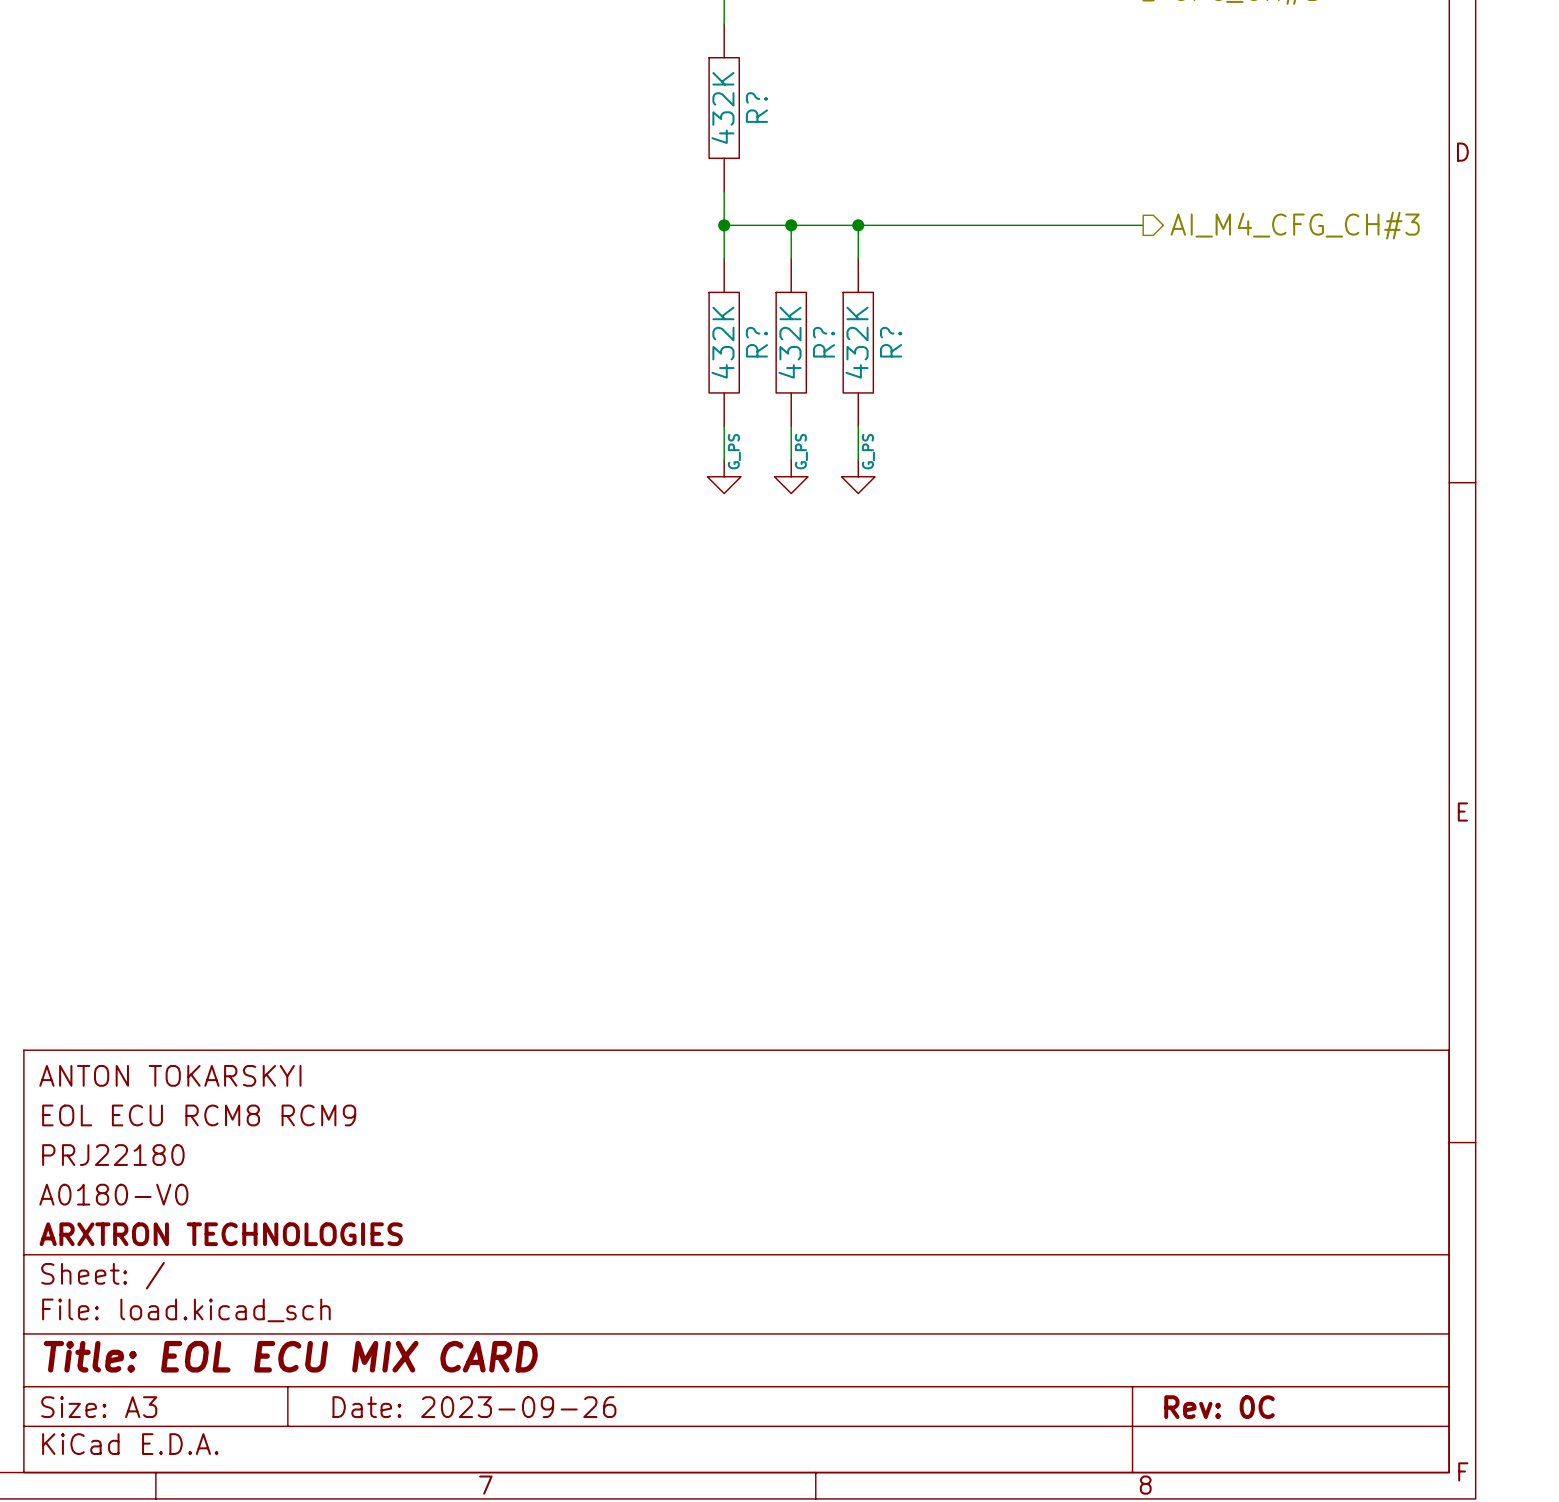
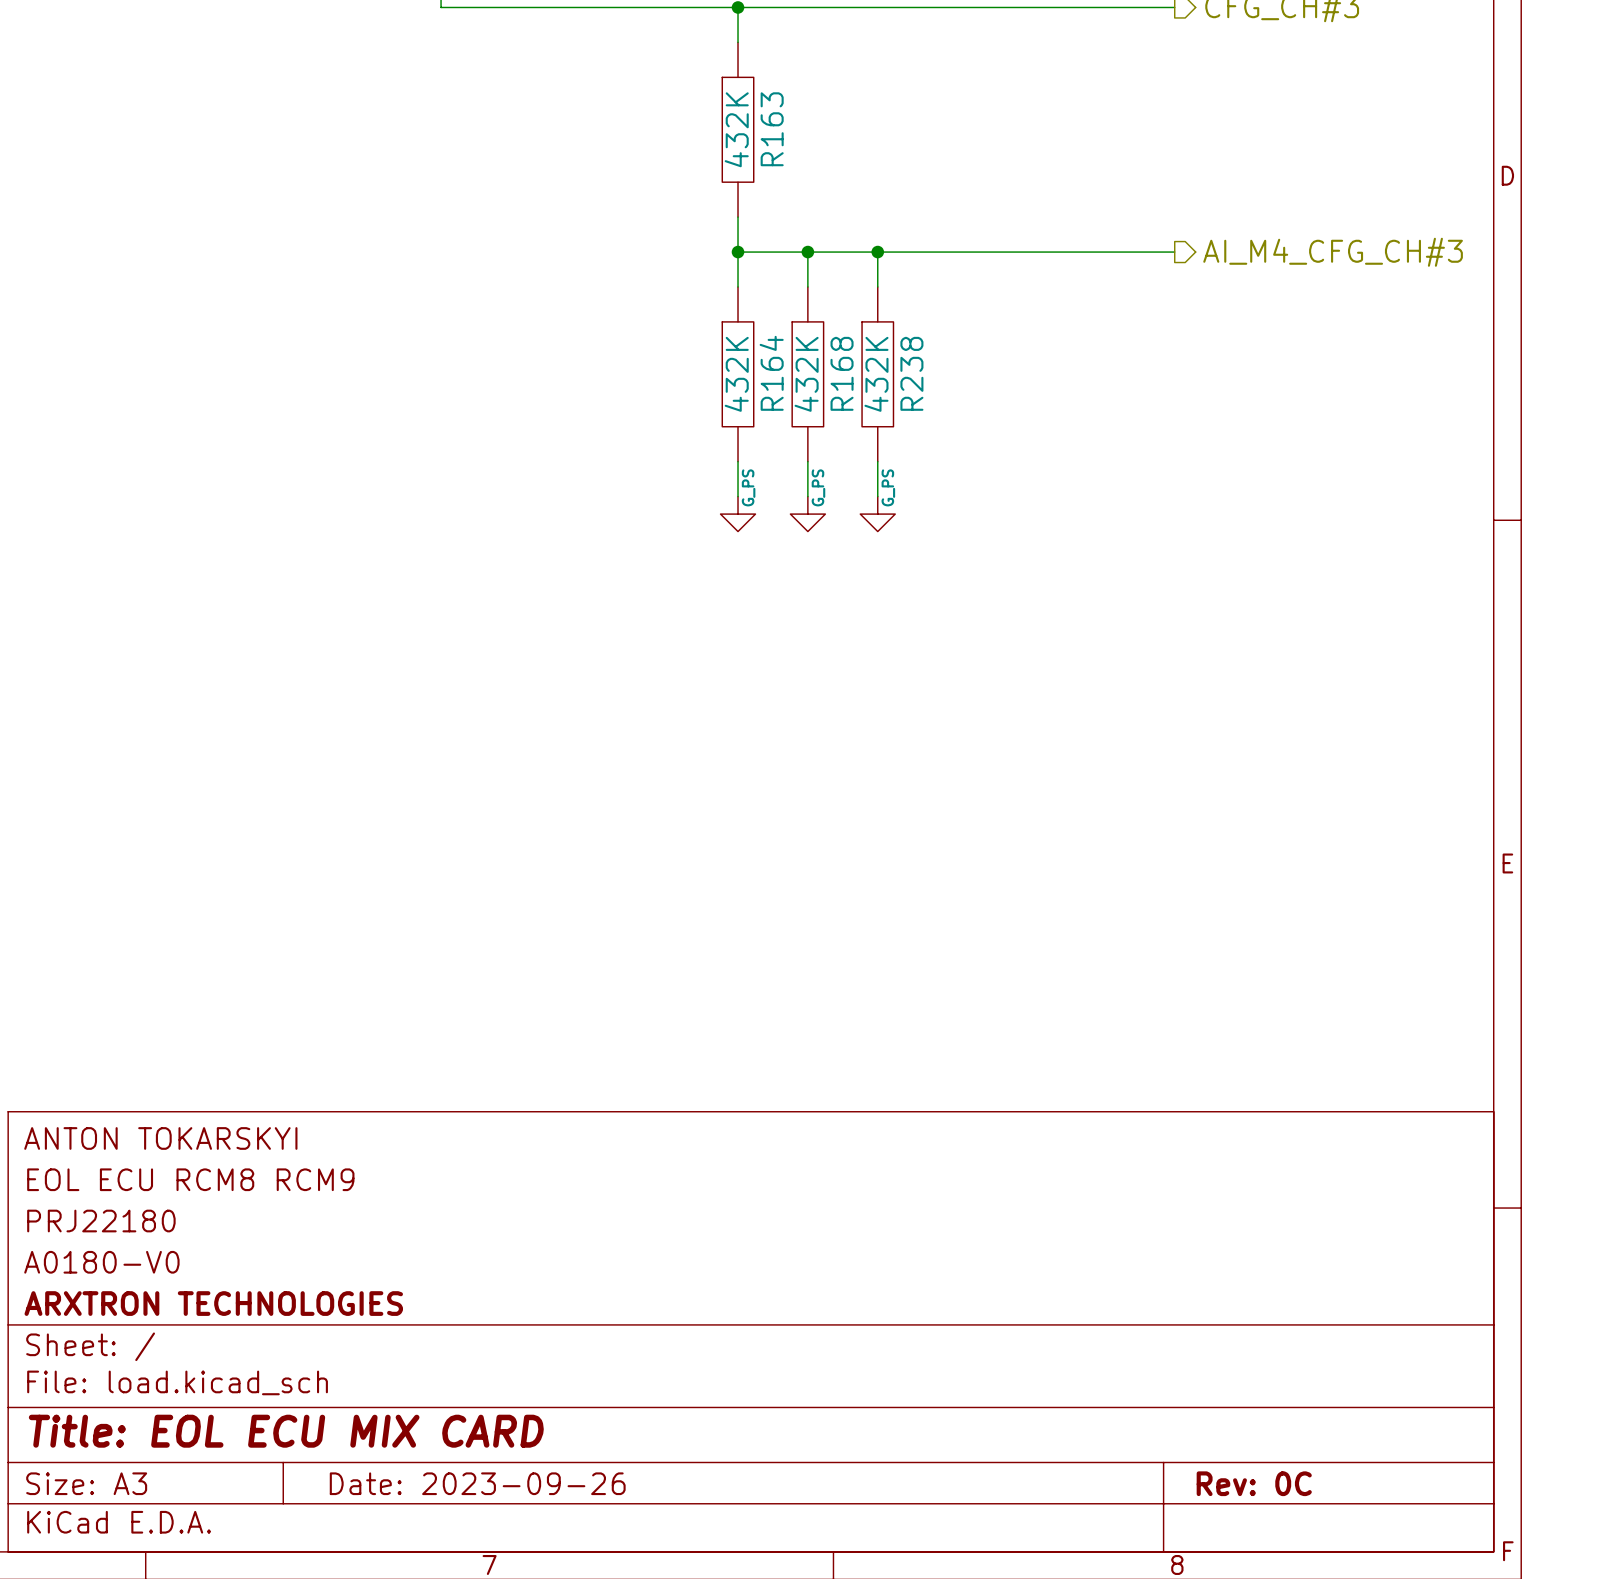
R? name: R? (756, 107) -> R163 (772, 129)
R? name: R? (756, 342) -> R164 (771, 373)
R? name: R? (823, 342) -> R168 (842, 373)
R? name: R? (891, 342) -> R238 (911, 373)

